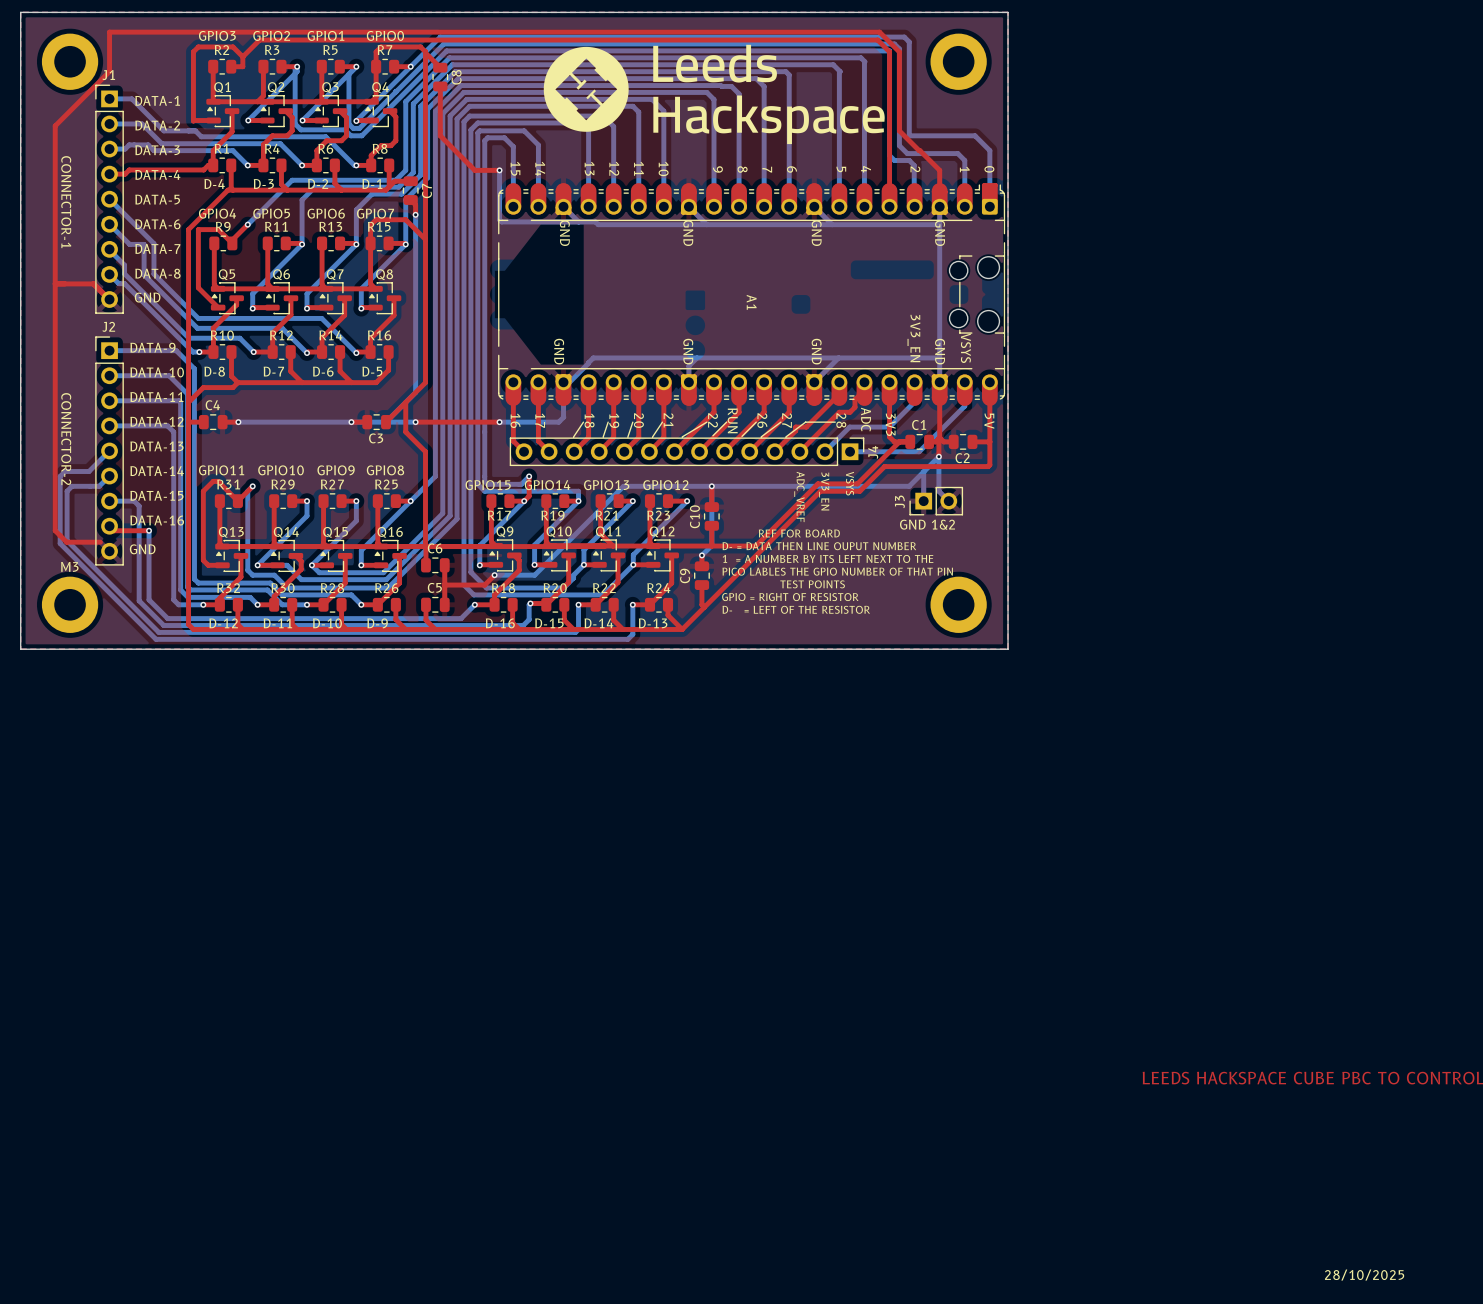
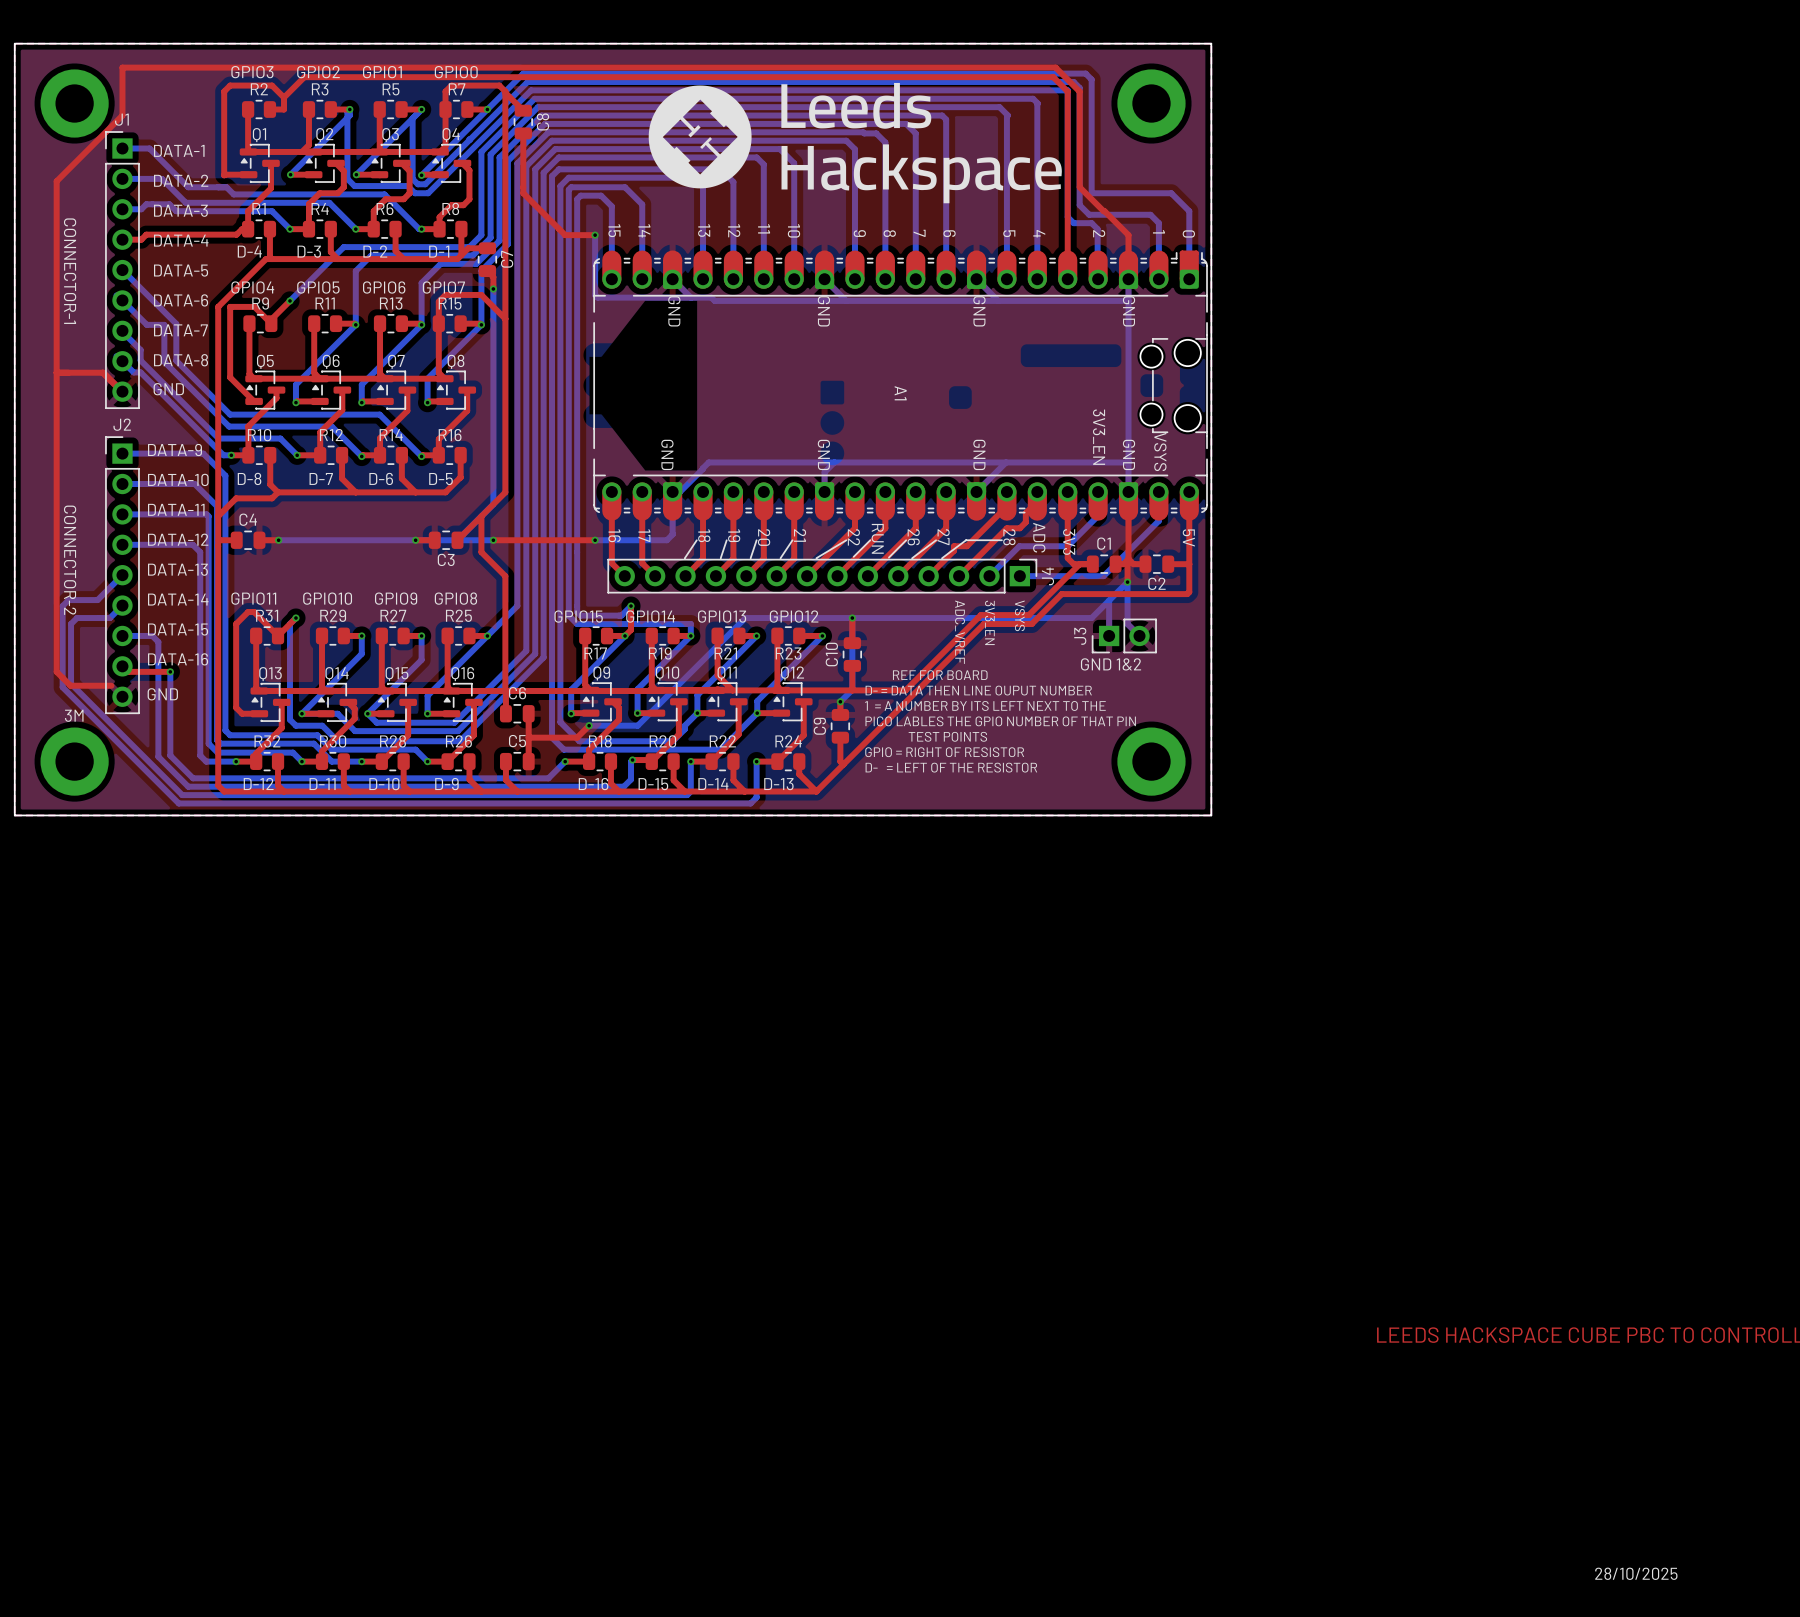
M3 name: M3 (69, 566) -> 3M (74, 715)

